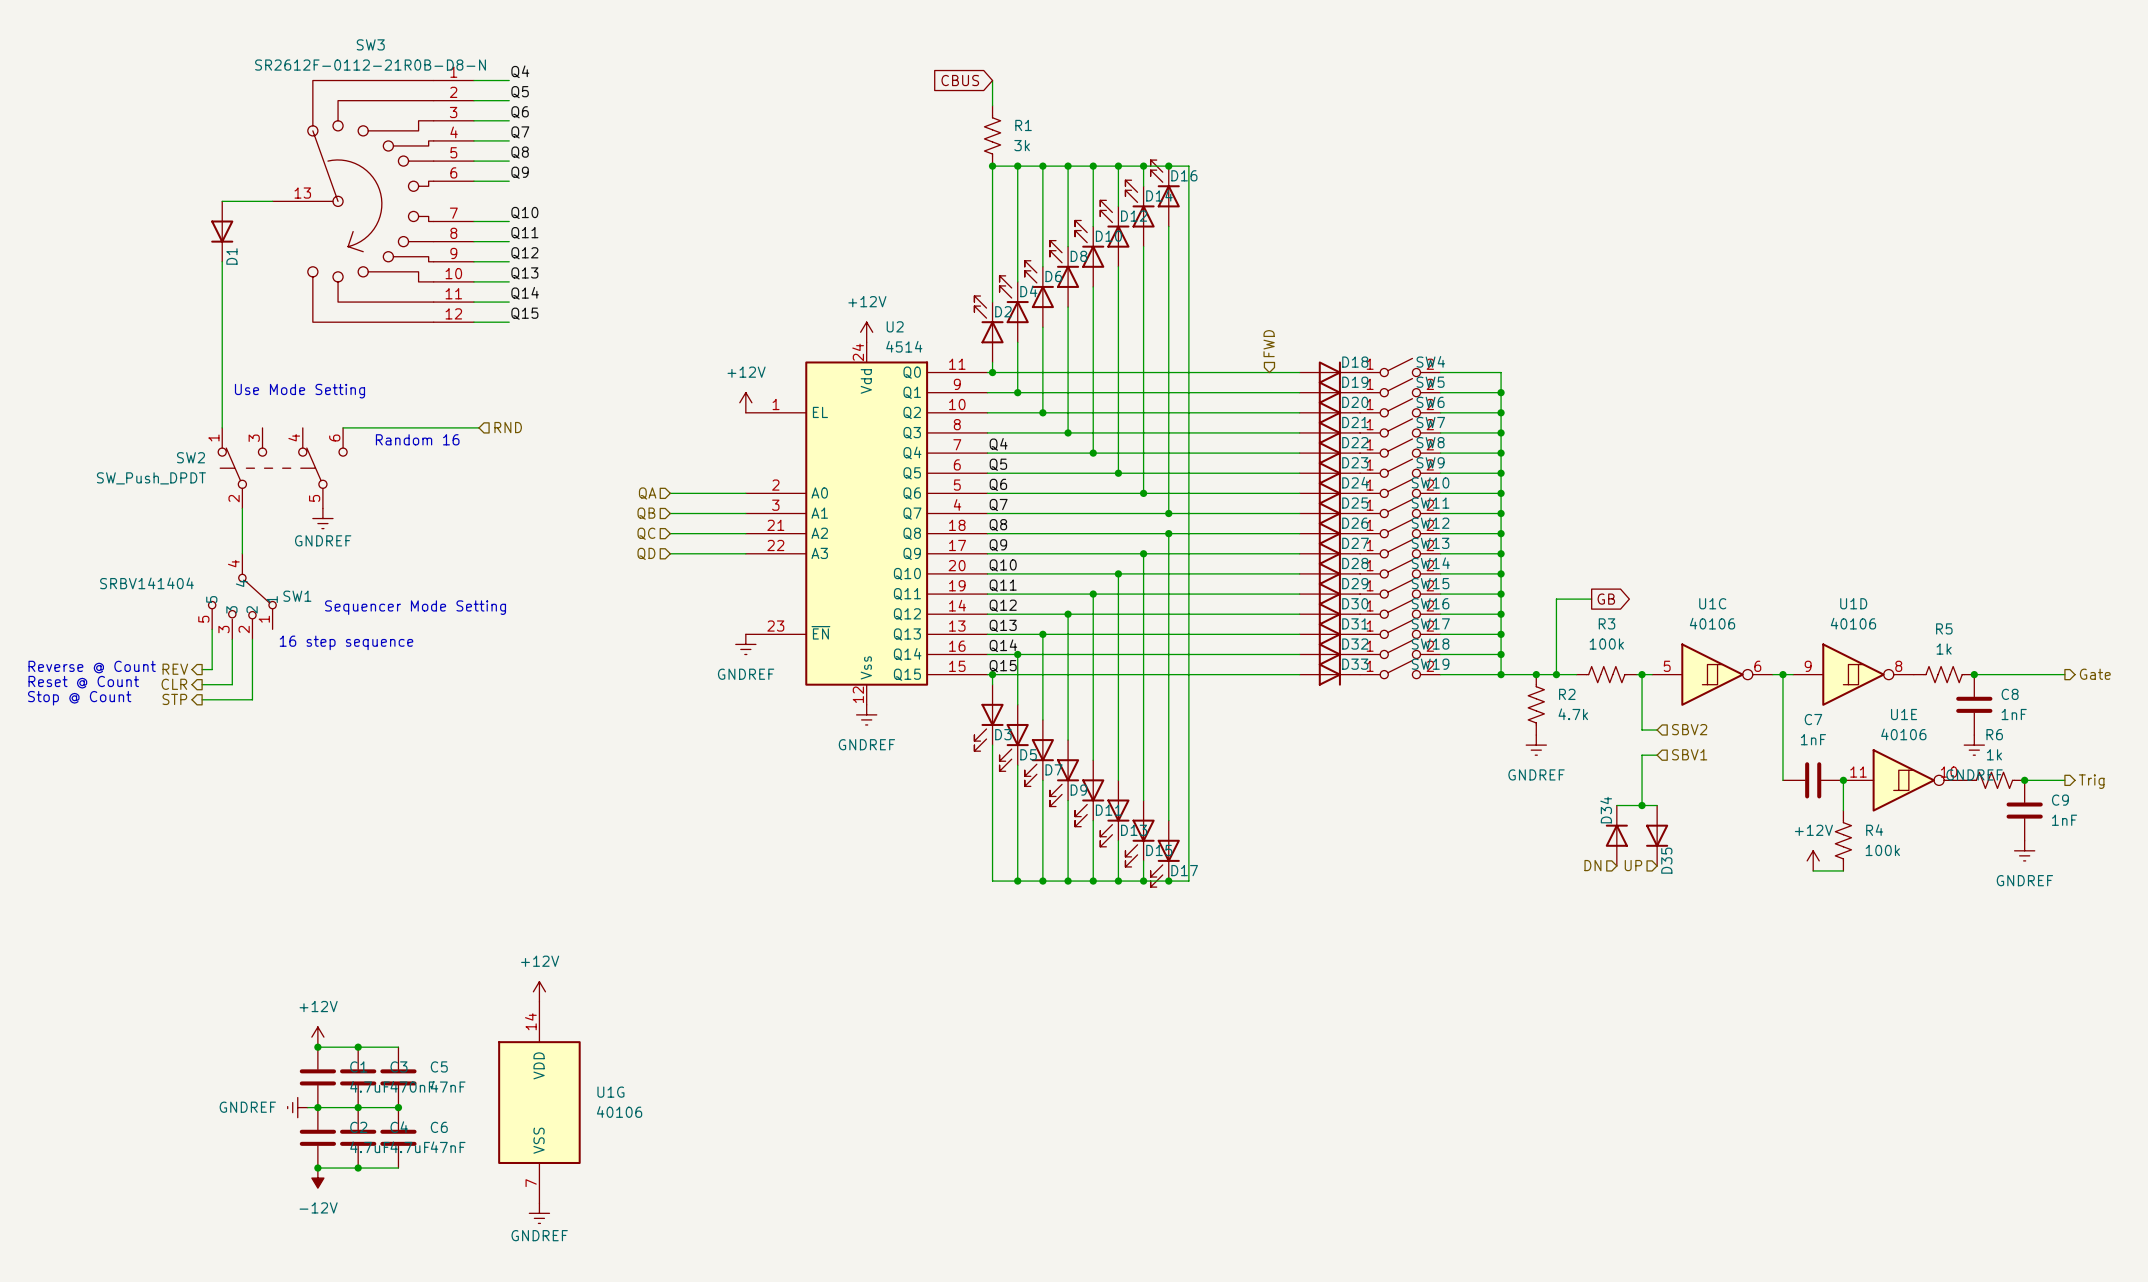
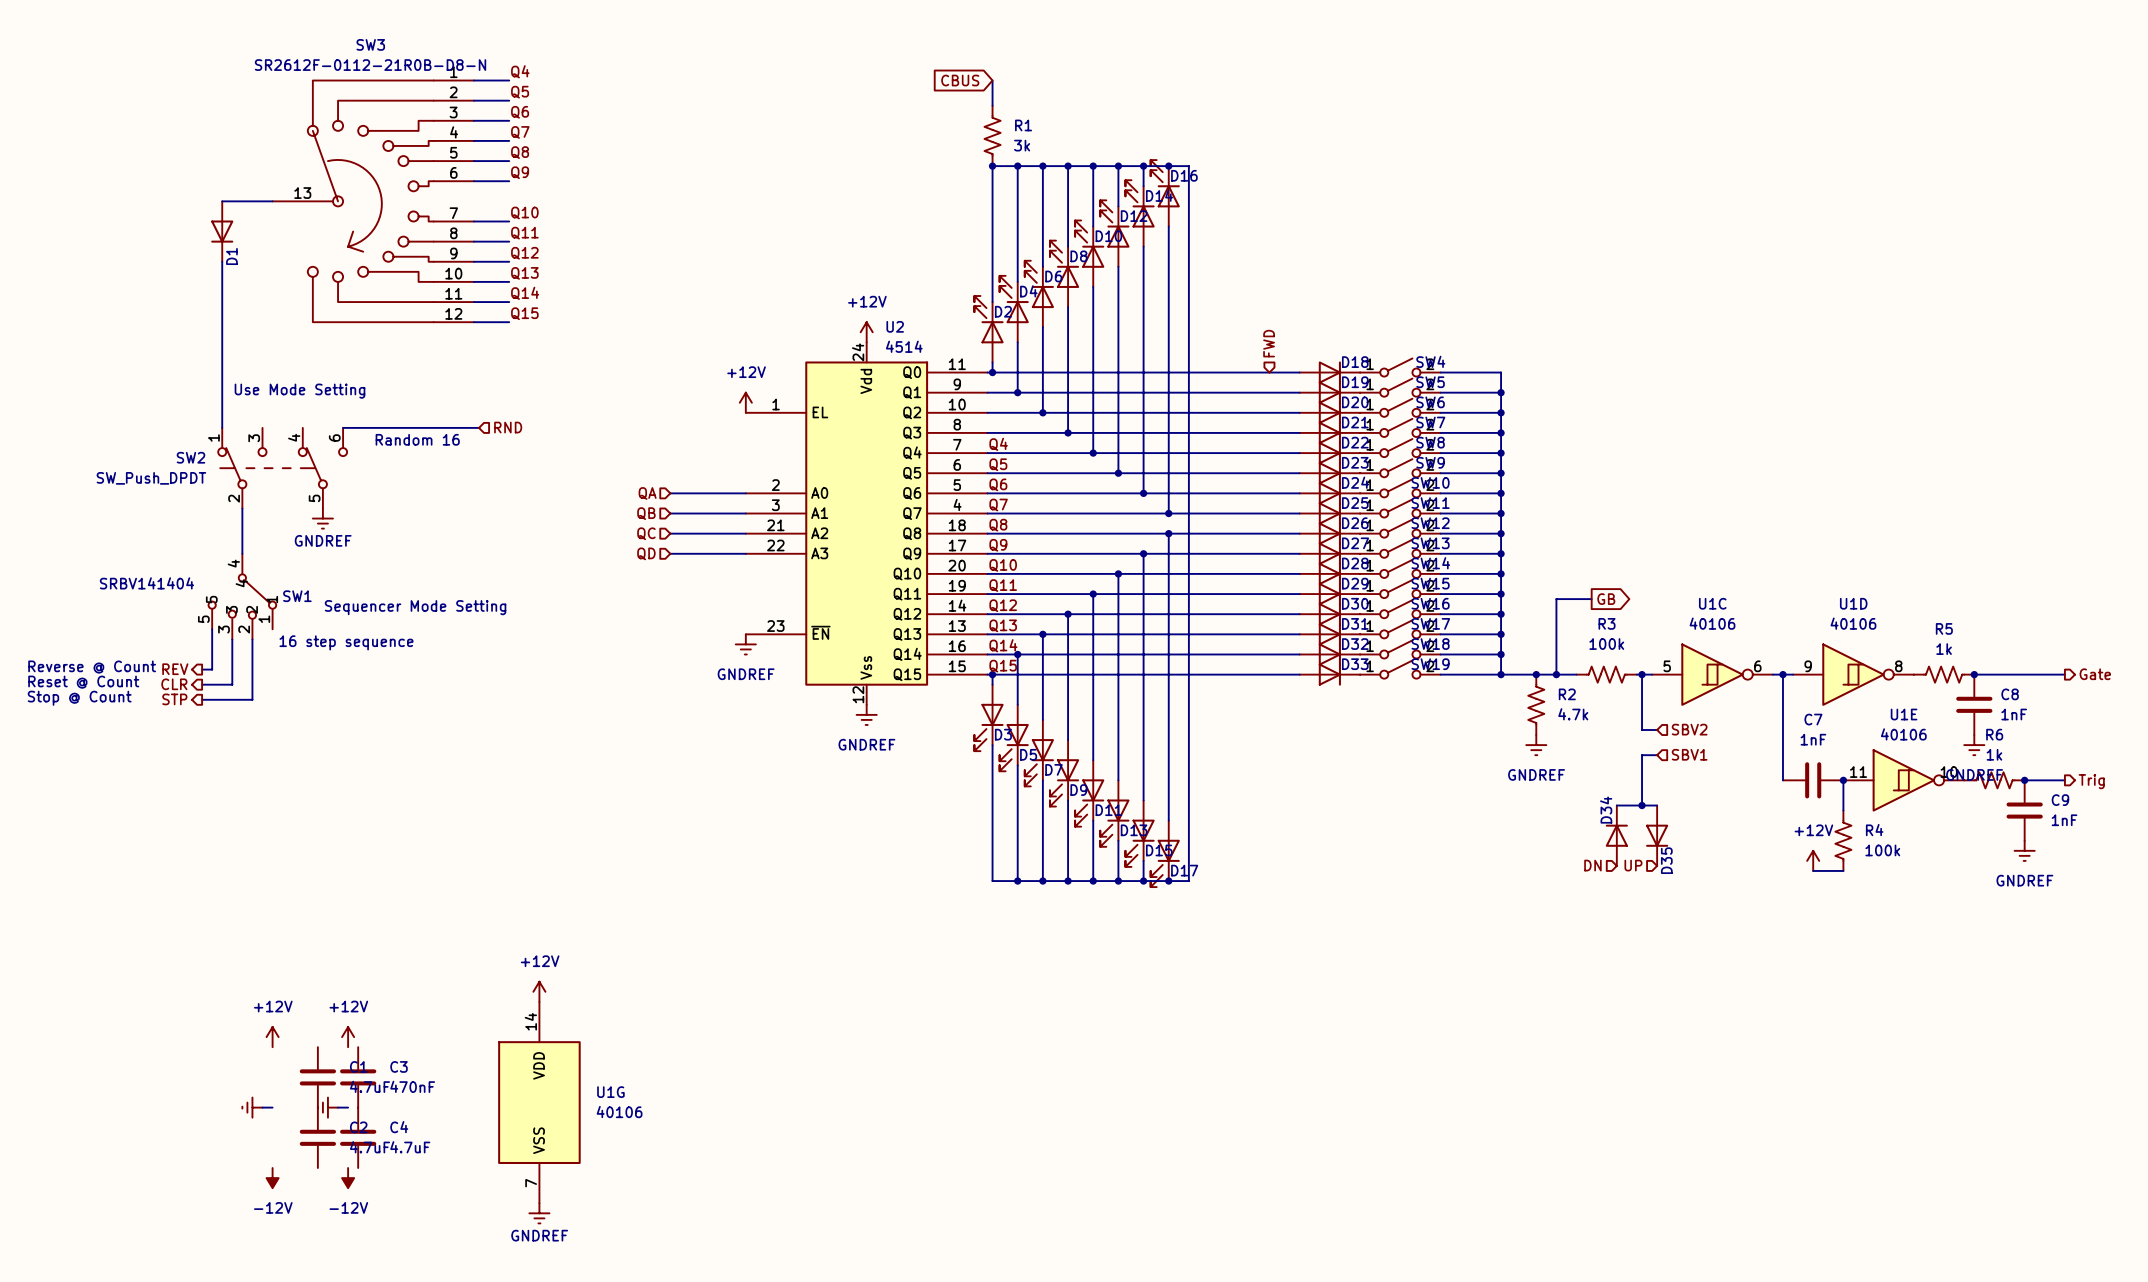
power symbol: none -> +12V (272, 1037)
power symbol: +12V (317, 1037) -> none
power symbol: none -> +12V (348, 1037)
wire: (317, 1047) (398, 1047) -> none
junction: (317, 1047) -> none
junction: (358, 1047) -> none
C5: 47nF (398, 1077) -> none
power symbol: none -> (252, 1107)
wire: none -> (262, 1107) (272, 1107)
power symbol: GNDREF (297, 1107) -> none
wire: (307, 1107) (338, 1107) -> none
junction: (317, 1107) -> none
power symbol: none -> (327, 1107)
wire: (348, 1107) (398, 1107) -> none
junction: (358, 1107) -> none
junction: (398, 1107) -> none
C6: 47nF (398, 1137) -> none
wire: (317, 1168) (398, 1168) -> none
junction: (317, 1168) -> none
junction: (358, 1168) -> none
power symbol: none -> -12V (272, 1178)
power symbol: -12V (317, 1178) -> none
power symbol: none -> -12V (348, 1178)

